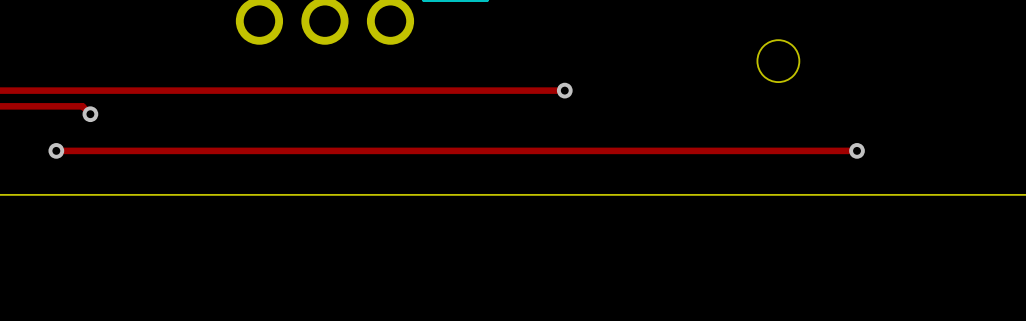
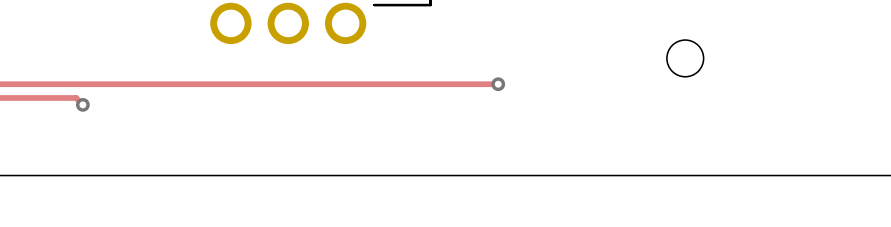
track: (56, 150) (857, 150) -> none
via: (56, 150) -> none
via: (857, 150) -> none

